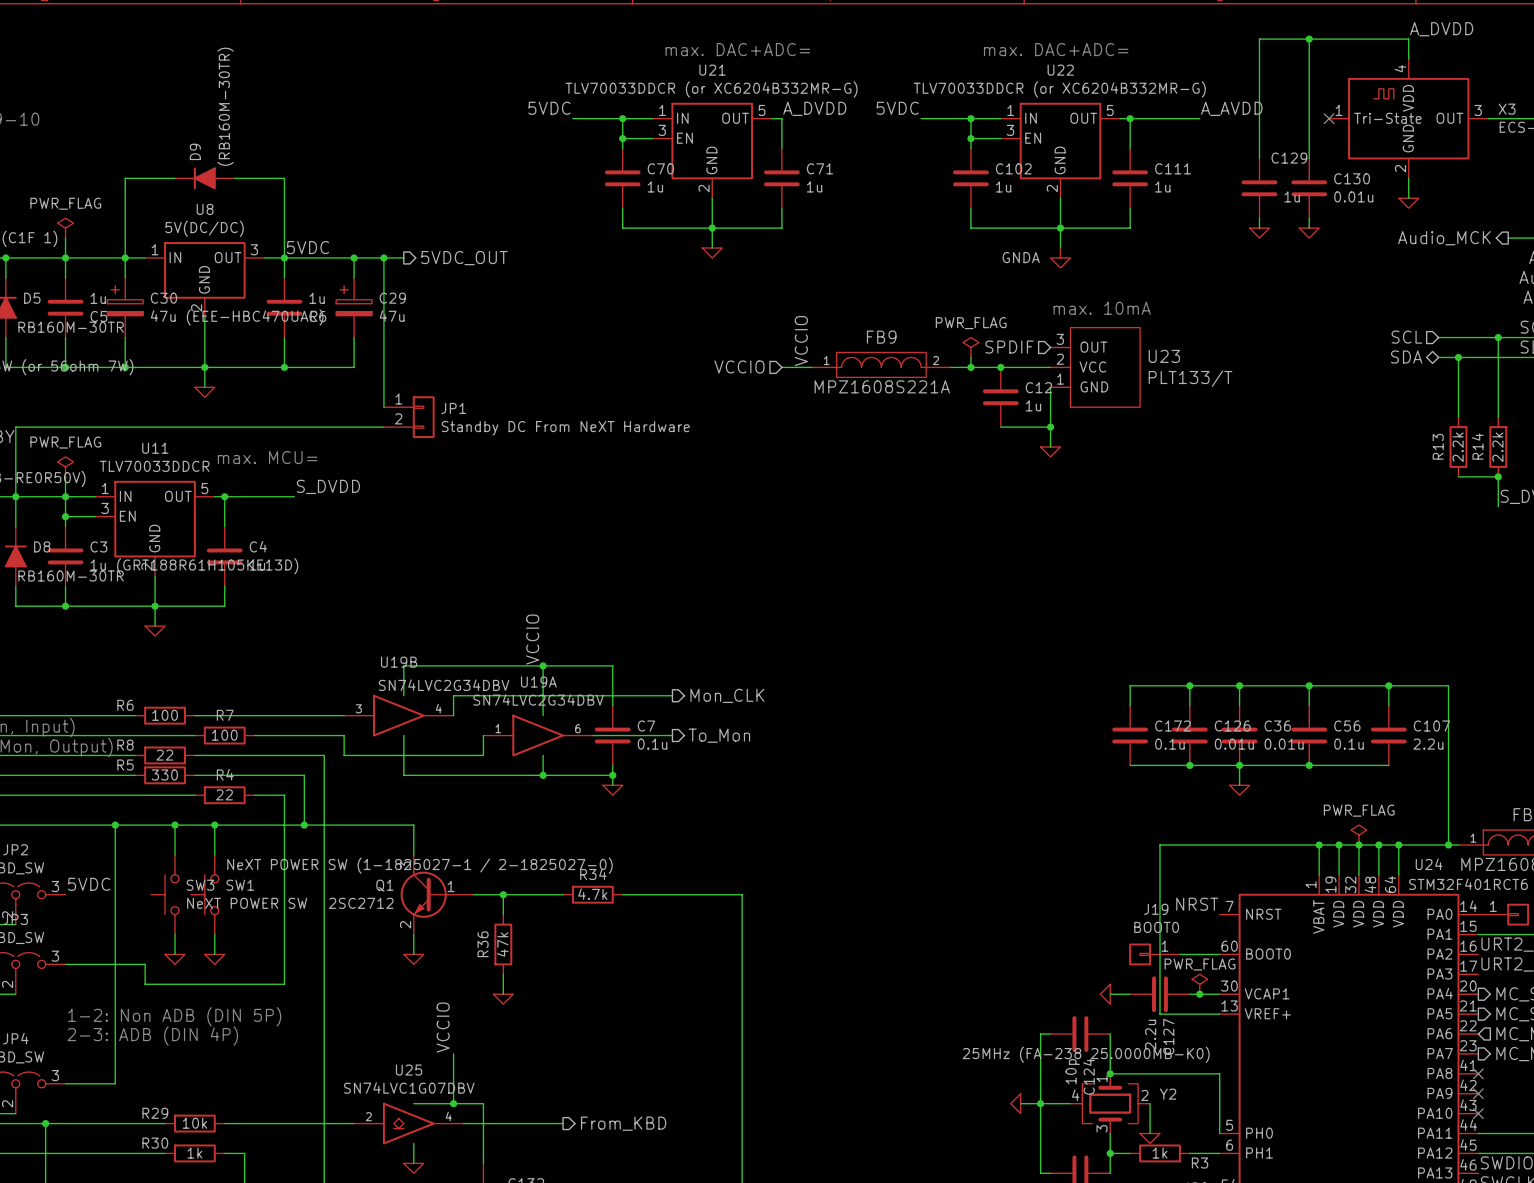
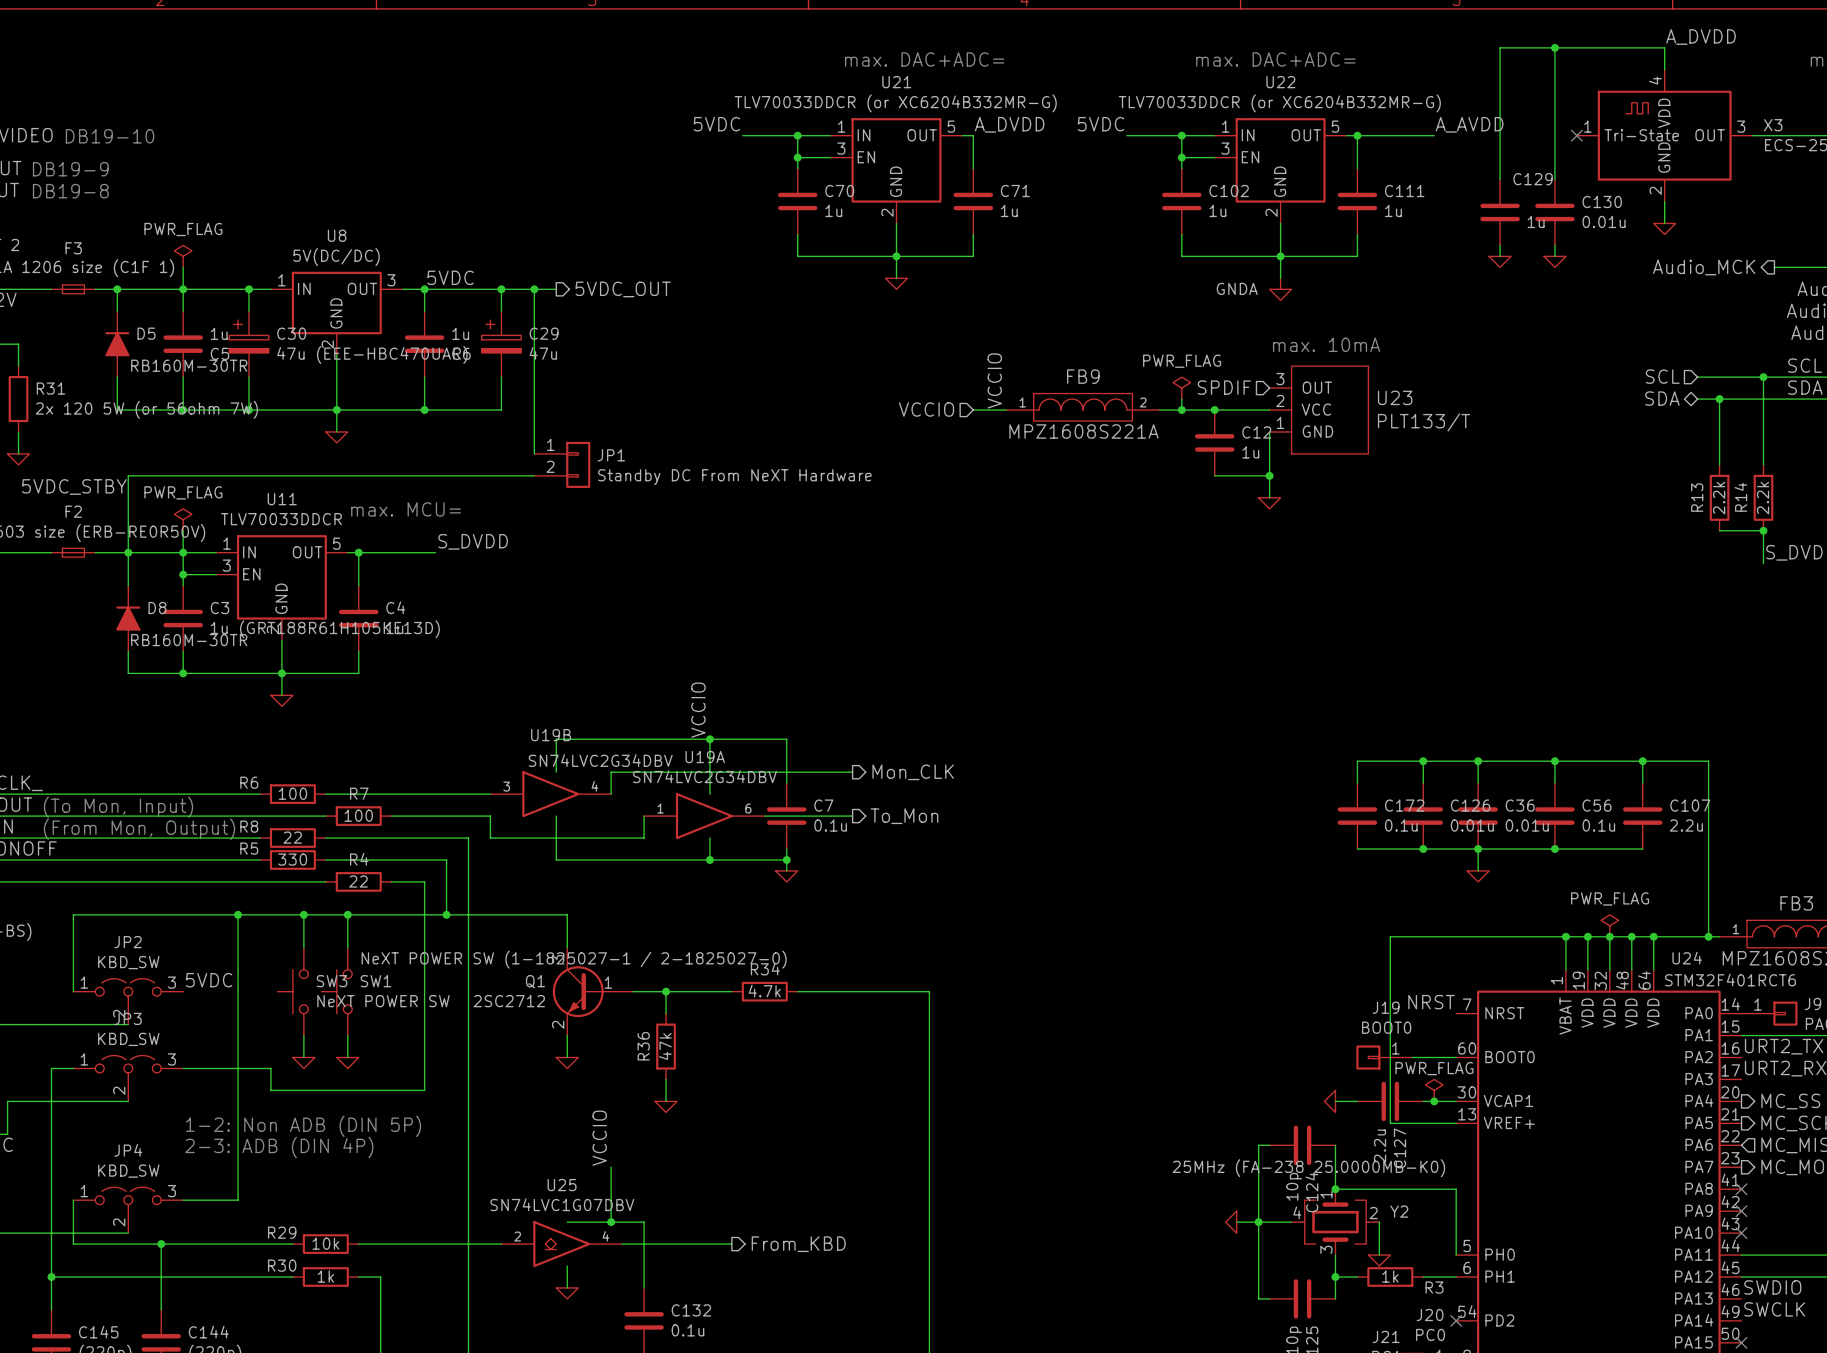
wire: (174, 178) (125, 178) (125, 257) -> none
D9: (RB160M-30TR) (204, 178) -> none
wire: (234, 178) (284, 178) (284, 257) -> none

